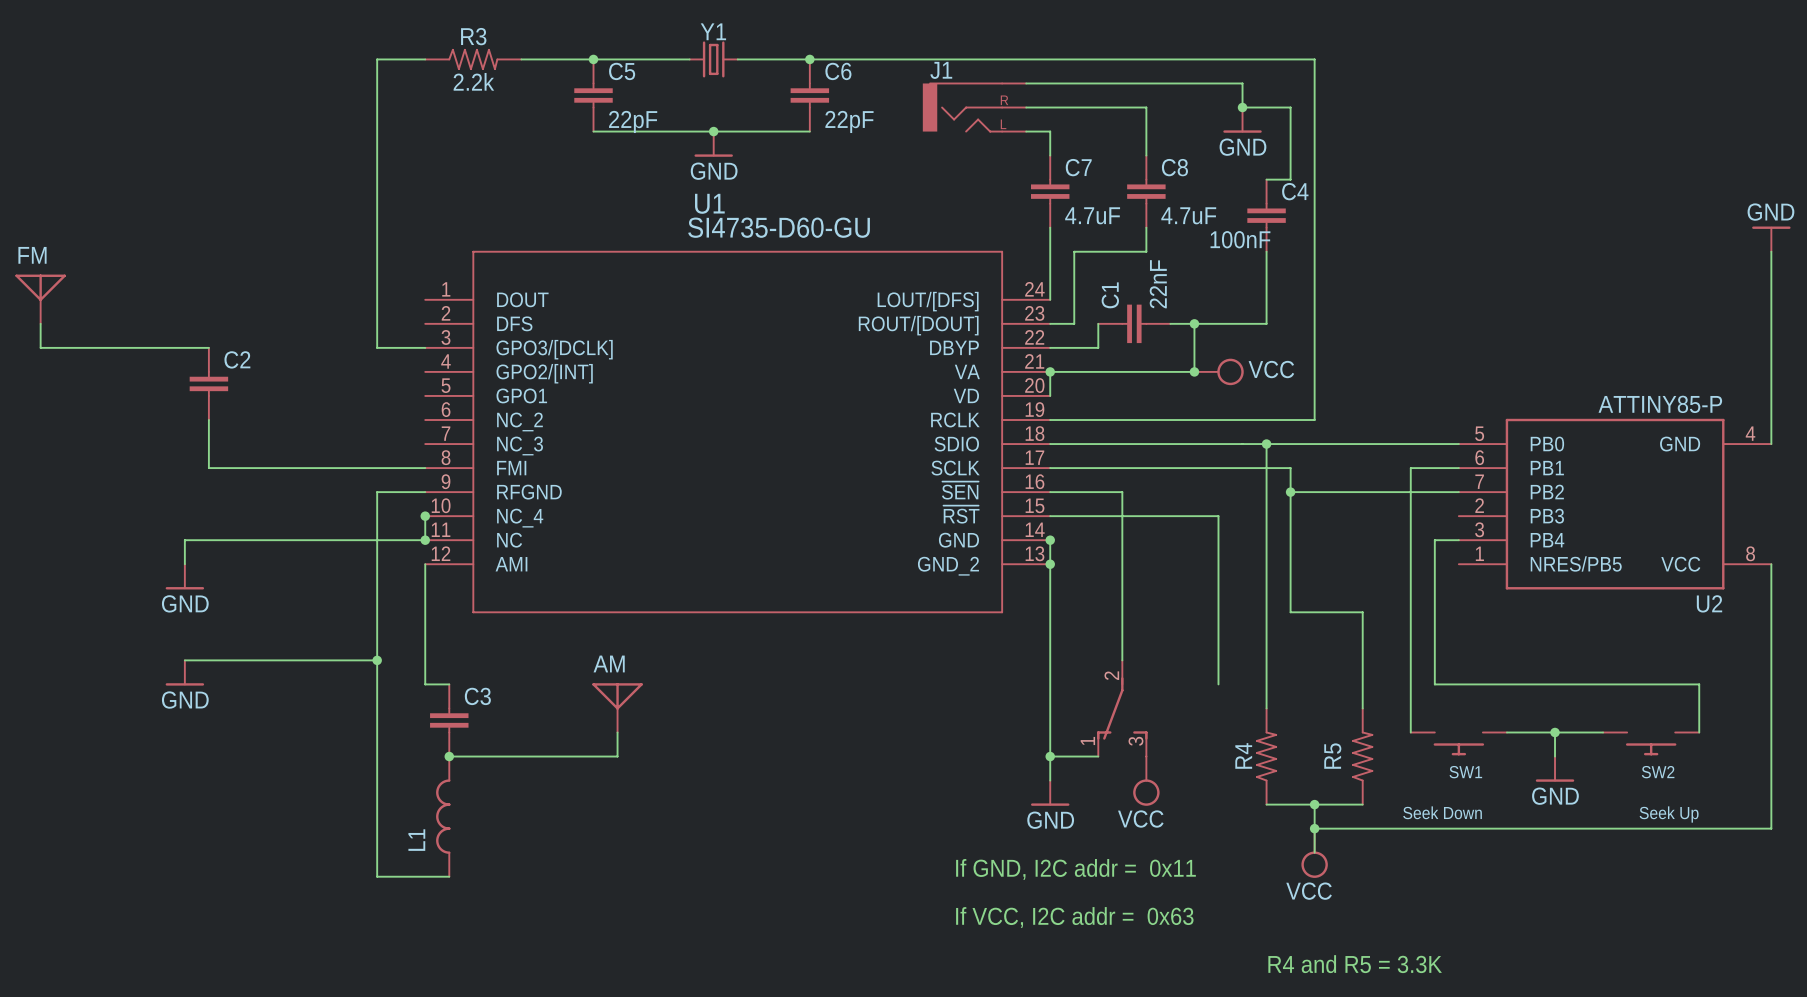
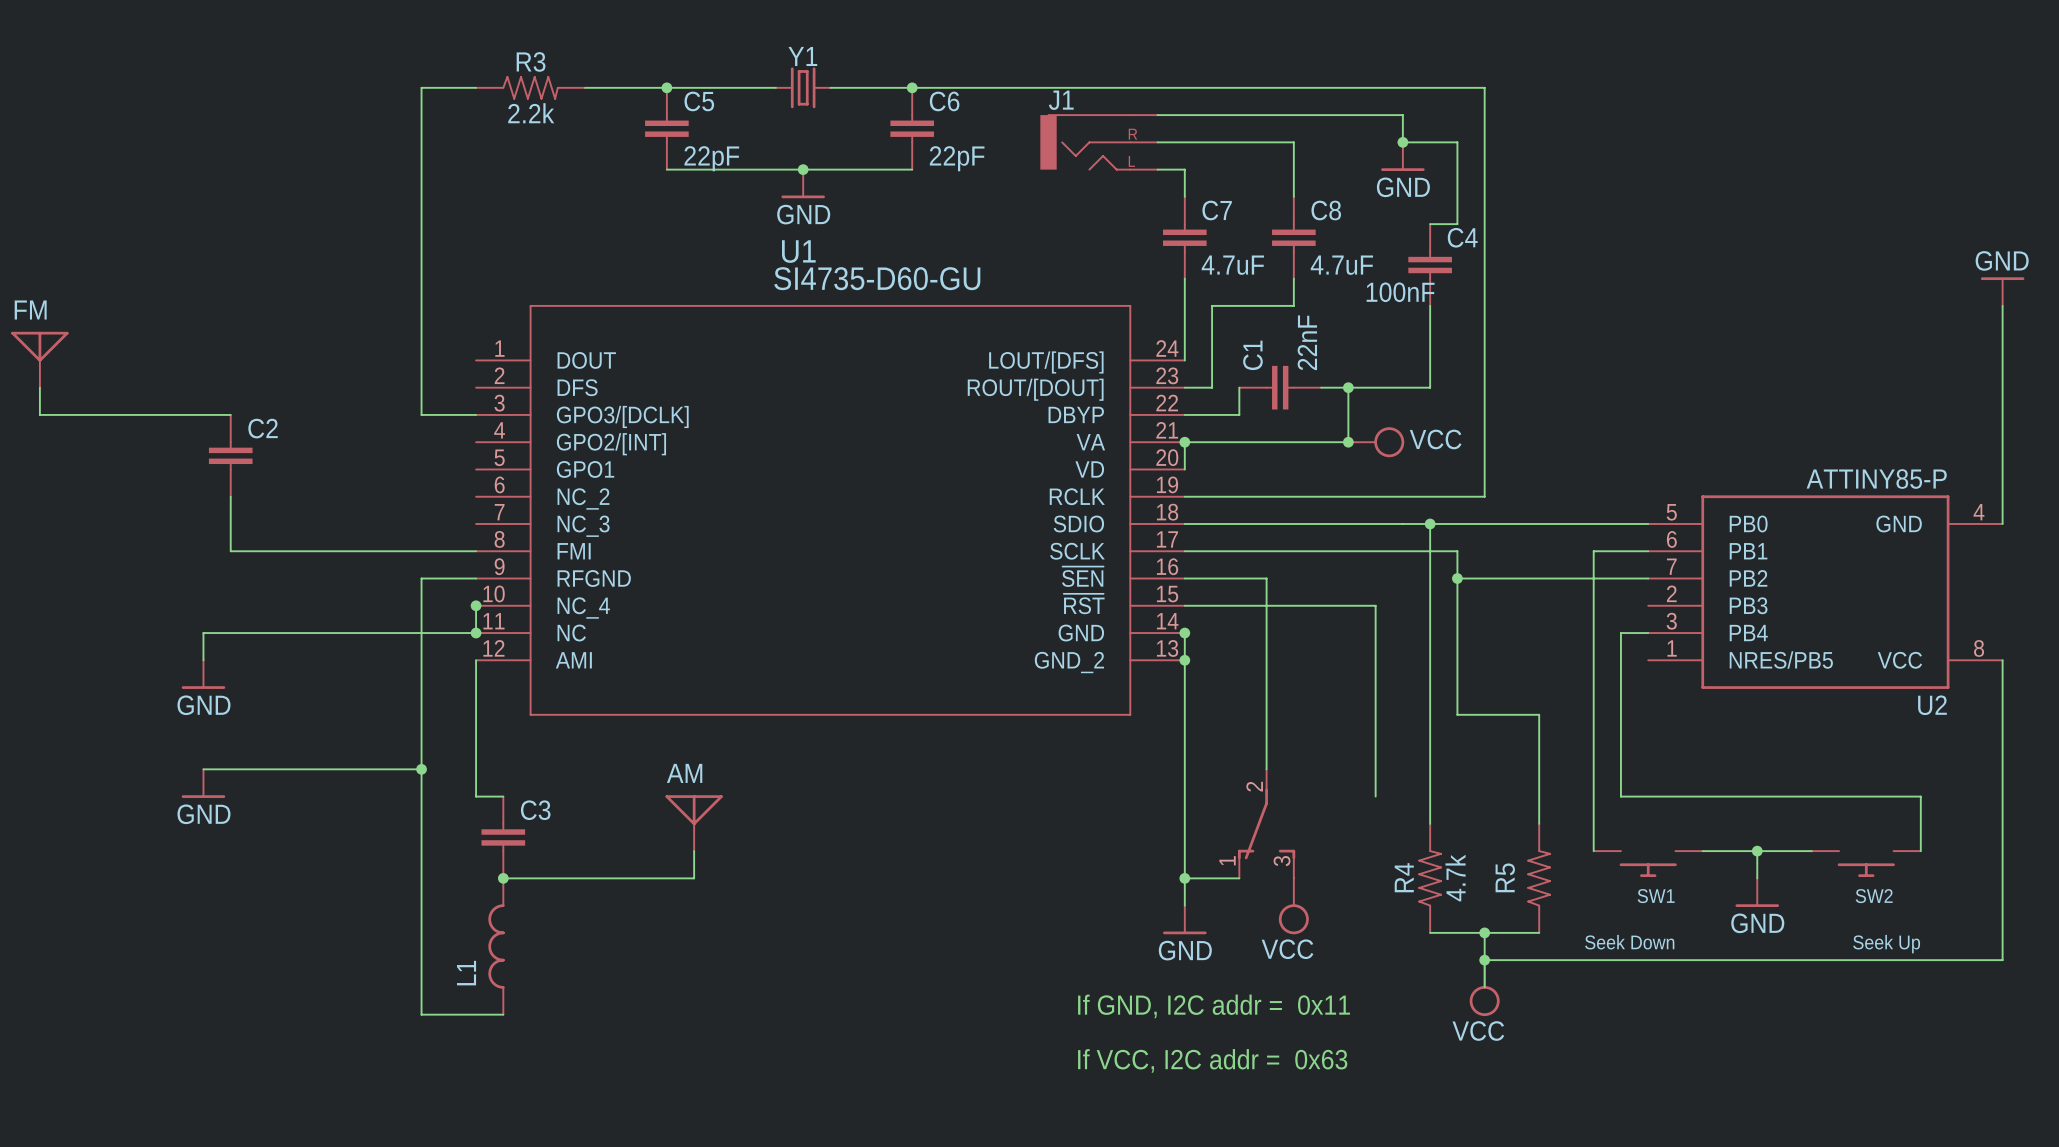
R4 value: none -> 4.7k (1455, 878)
text: R4 and R5 = 3.3K (1355, 964) -> none

